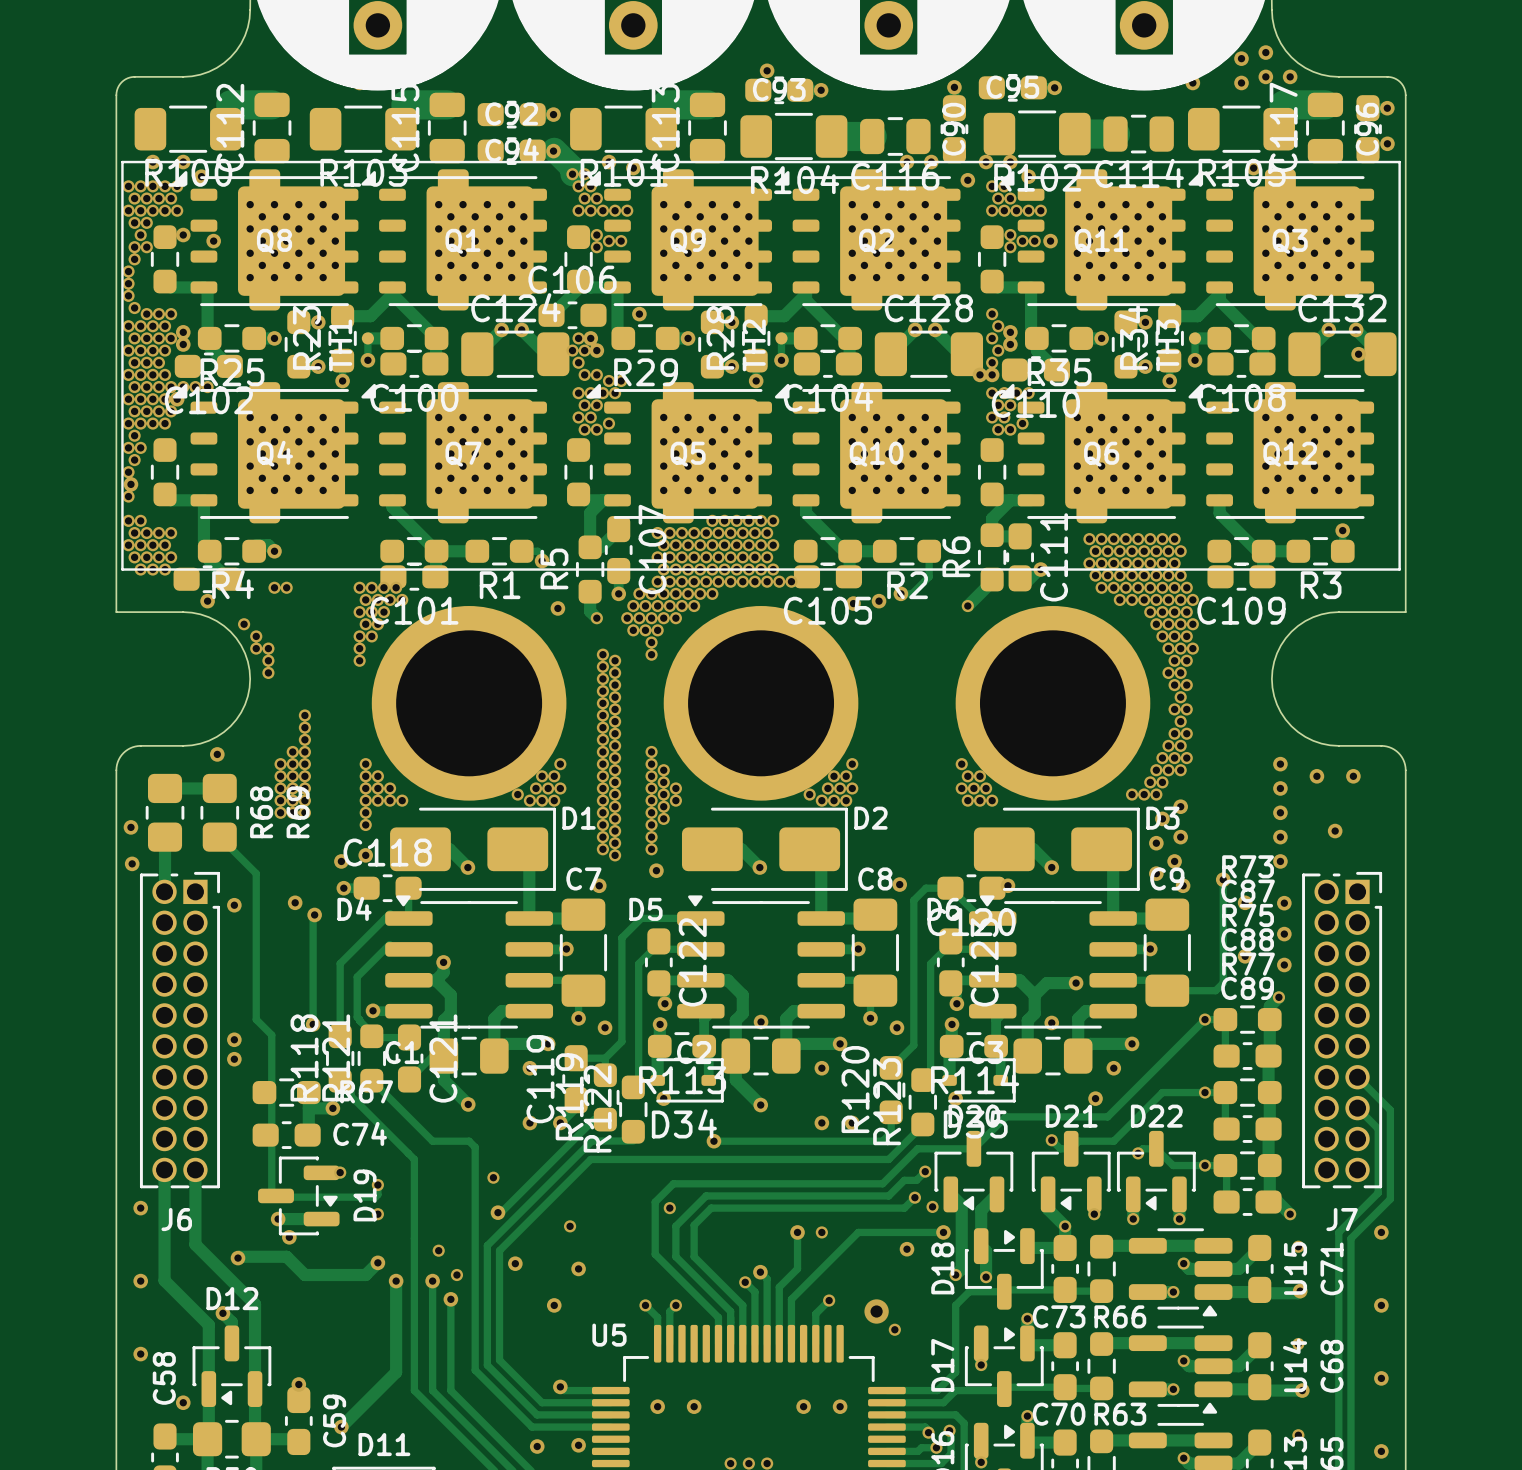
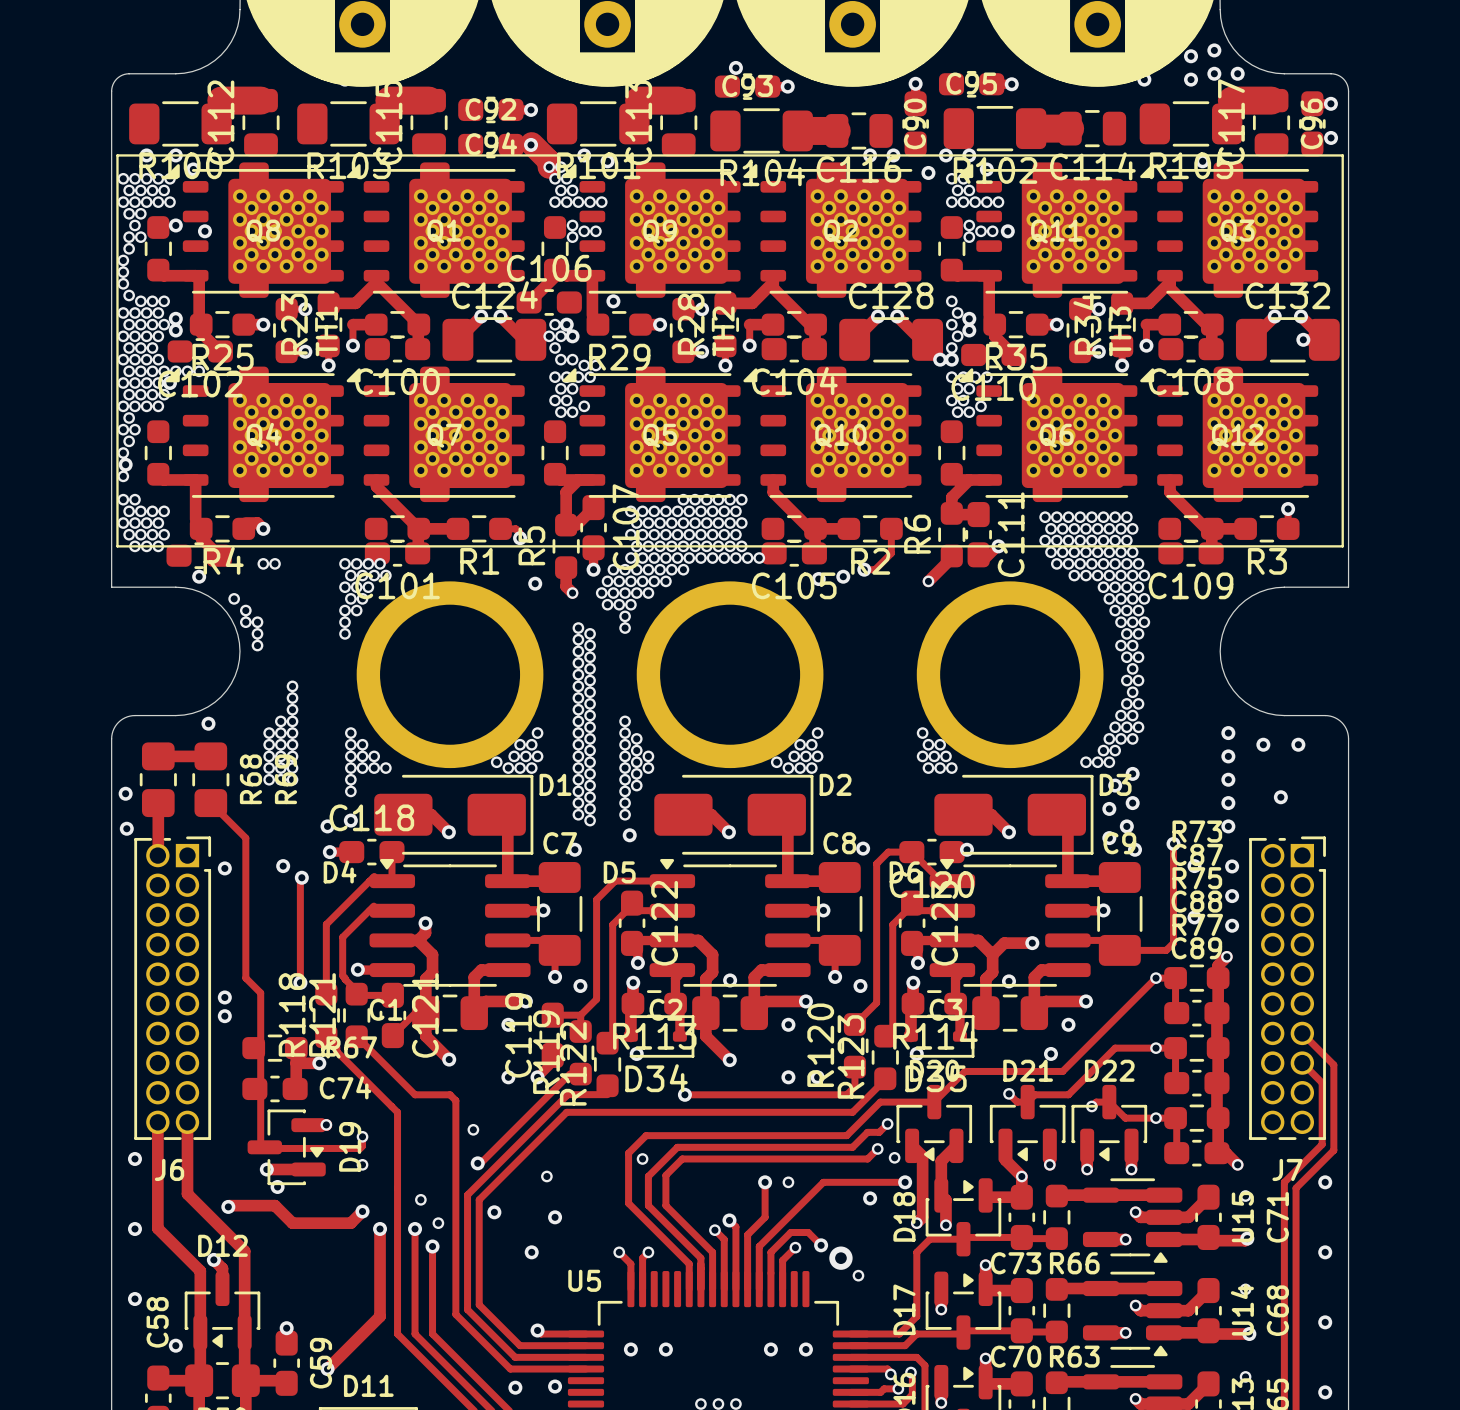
track: none -> (821, 1245) (808, 1232) (790, 1232) (770, 1252) (770, 1273)
via: none -> (821, 1245)

